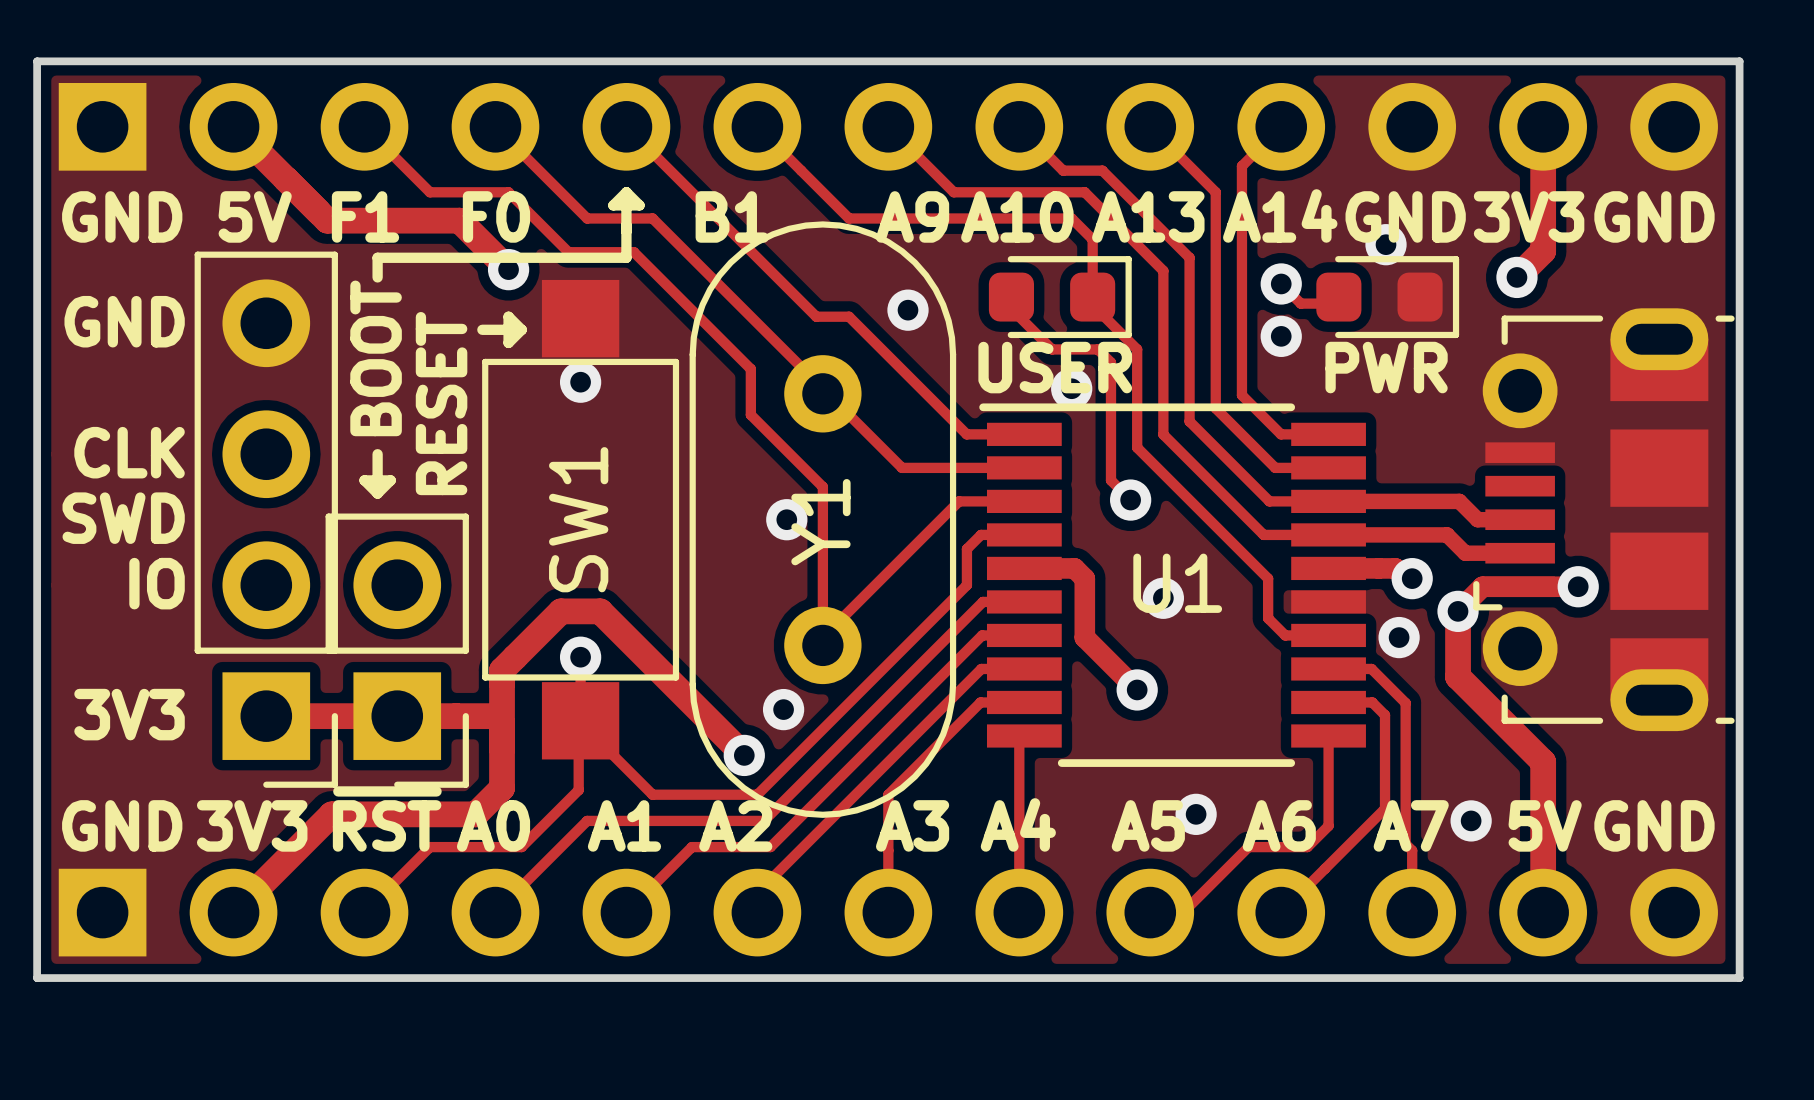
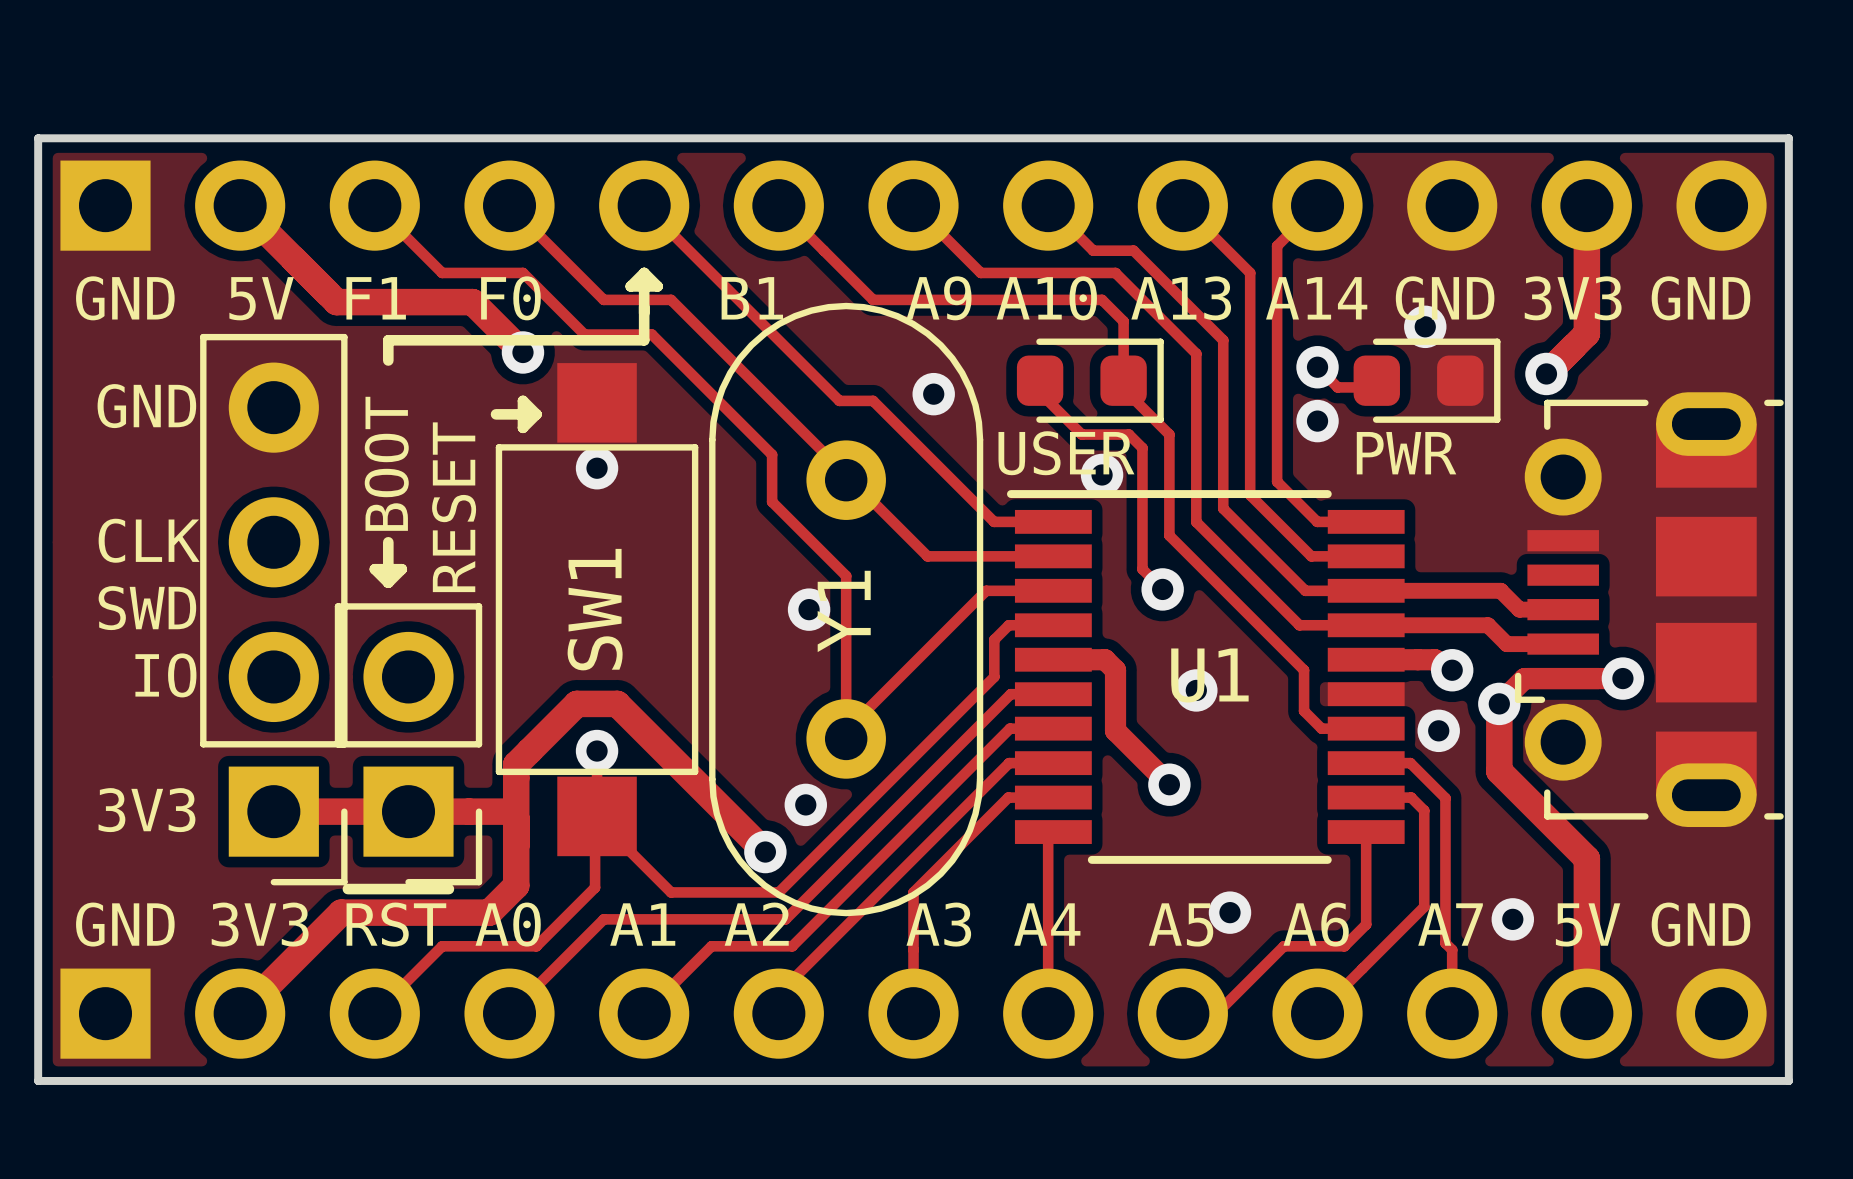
via position: (1516, 277) -> (1546, 373)

